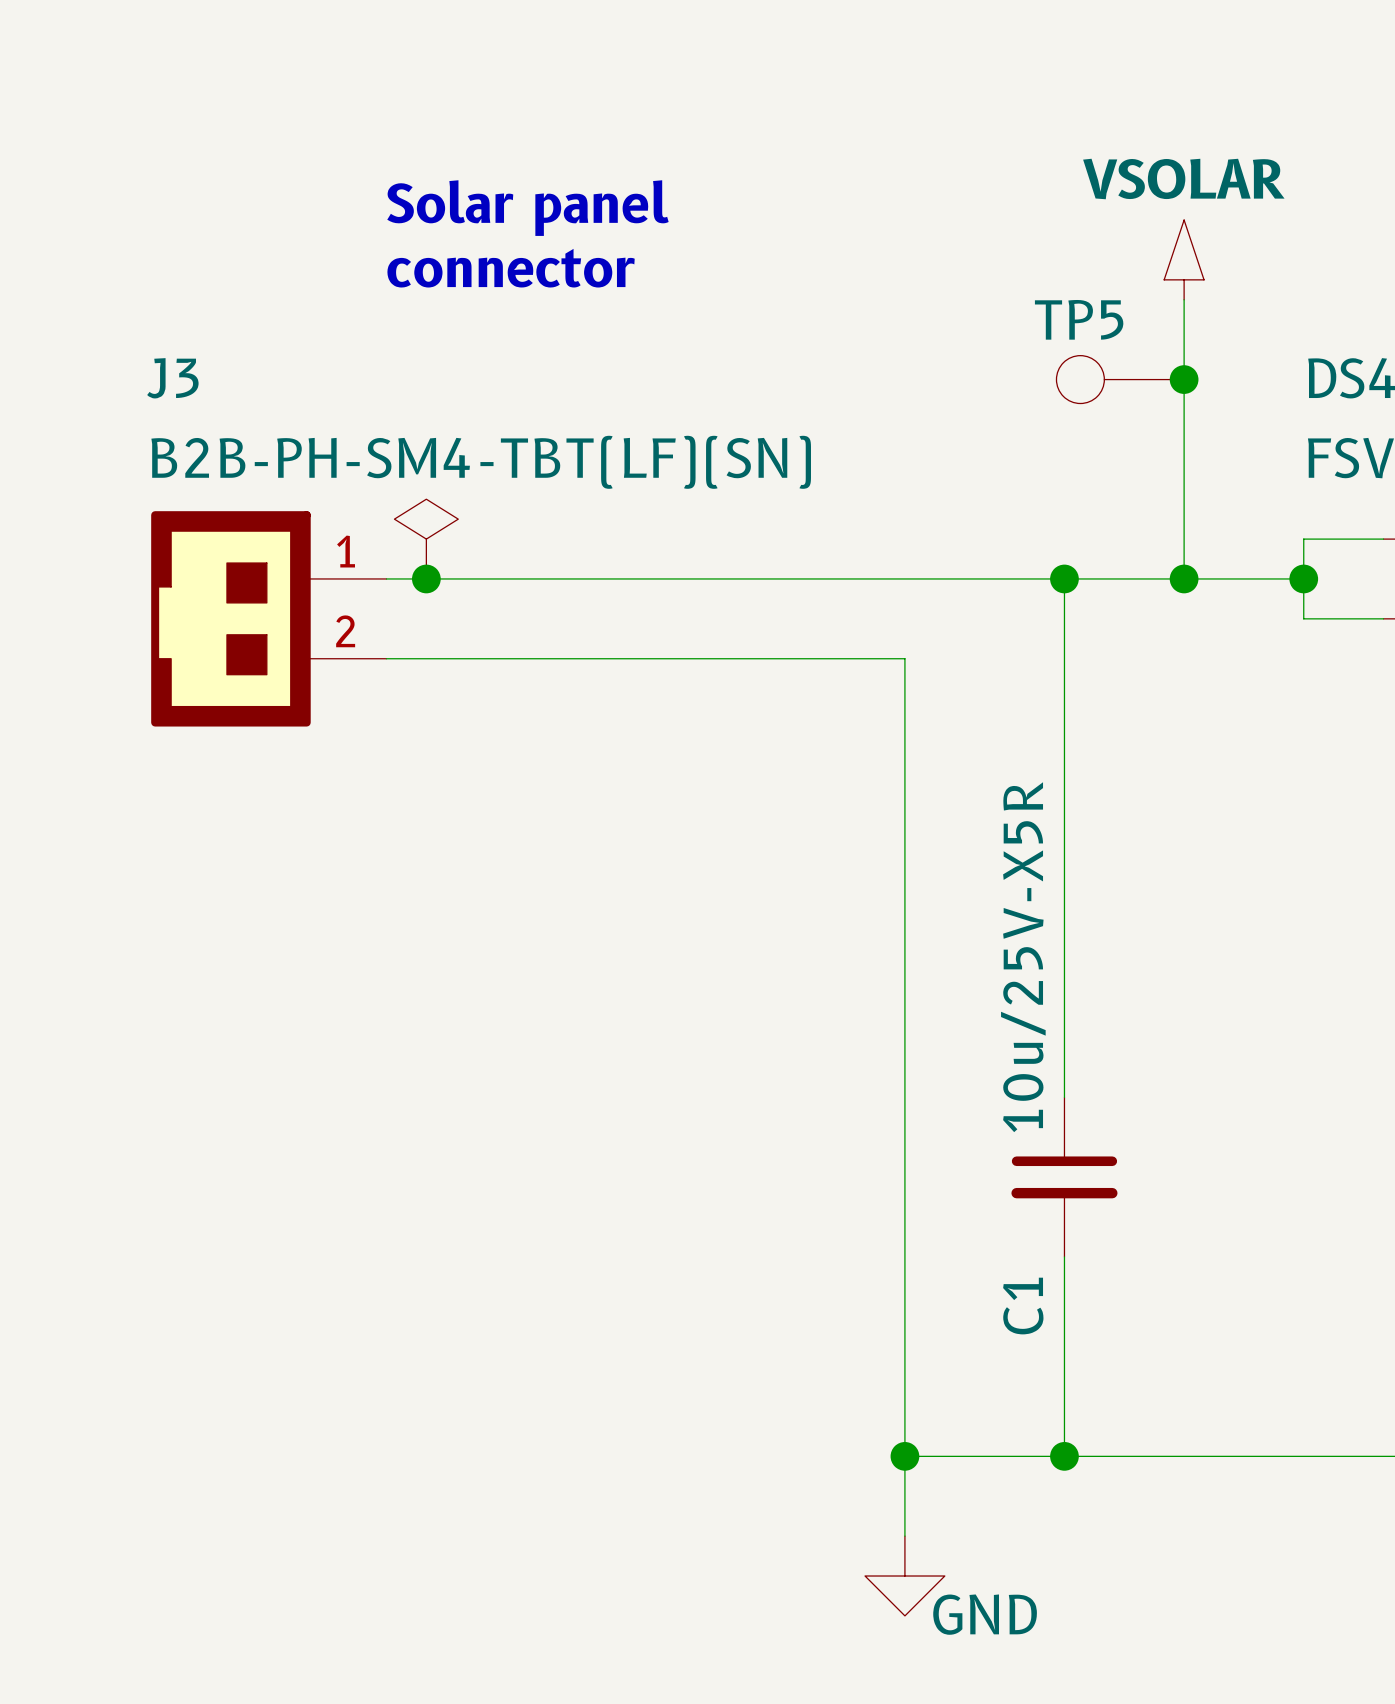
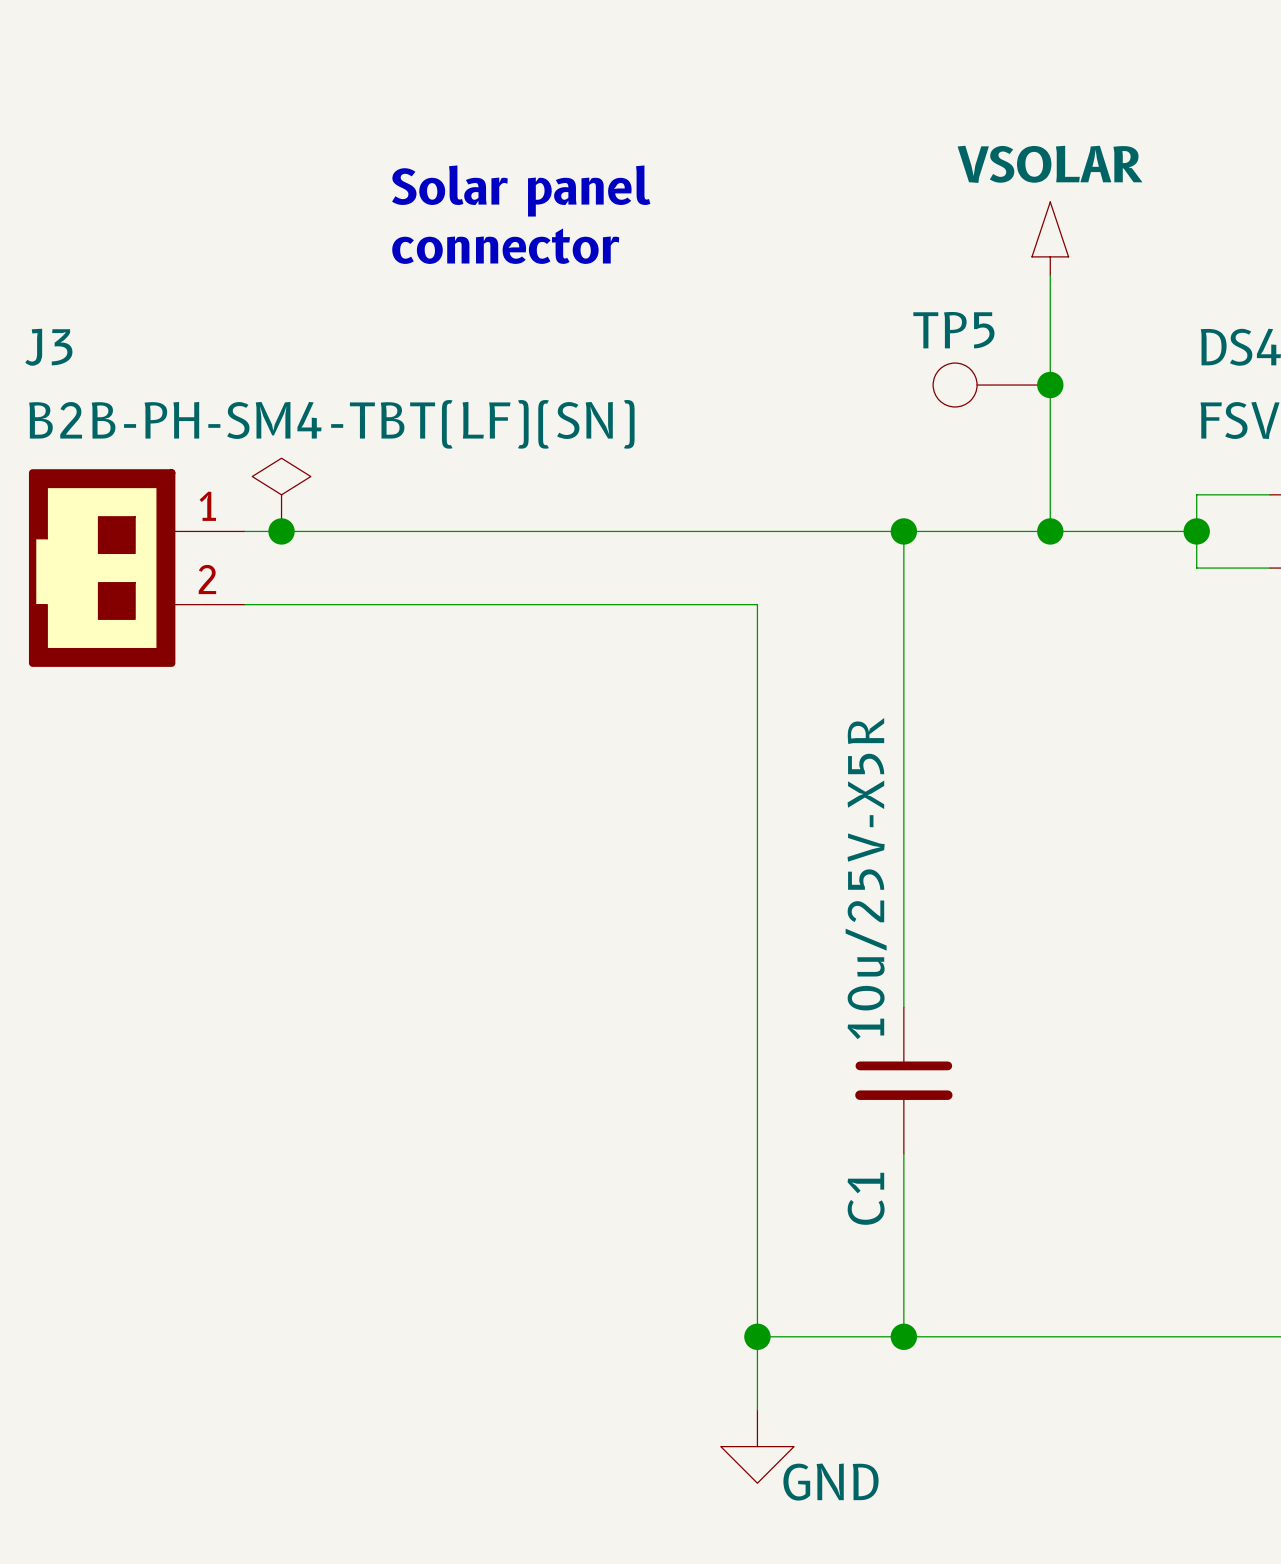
text position: Solar panel (527, 208) -> Solar panel (521, 191)
power symbol position: VSOLAR (1184, 259) -> VSOLAR (1050, 238)
text position: connector (511, 268) -> connector (505, 246)
wire: (1184, 299) (1184, 578) -> (1050, 275) (1050, 531)
TP5 position: (1120, 379) -> (991, 385)
junction position: (1184, 379) -> (1050, 385)
power symbol position: (426, 539) -> (281, 494)
junction position: (426, 578) -> (281, 531)
junction: none -> (903, 531)
wire: (1064, 578) (1064, 1097) -> (903, 531) (903, 1007)
junction: (1064, 578) -> none
junction: none -> (1050, 531)
junction: (1184, 578) -> none
J3 position: (268, 618) -> (136, 568)
wire: (825, 658) (904, 658) (904, 1536) -> (757, 604) (757, 1410)
C1 position: (1064, 1177) -> (903, 1080)
wire: (1064, 1256) (1064, 1456) -> (903, 1153) (903, 1336)
wire: none -> (757, 1336) (830, 1336)
junction: none -> (757, 1336)
junction: (904, 1456) -> none
junction: none -> (903, 1336)
junction: (1064, 1456) -> none
power symbol position: GND (904, 1576) -> GND (757, 1446)

